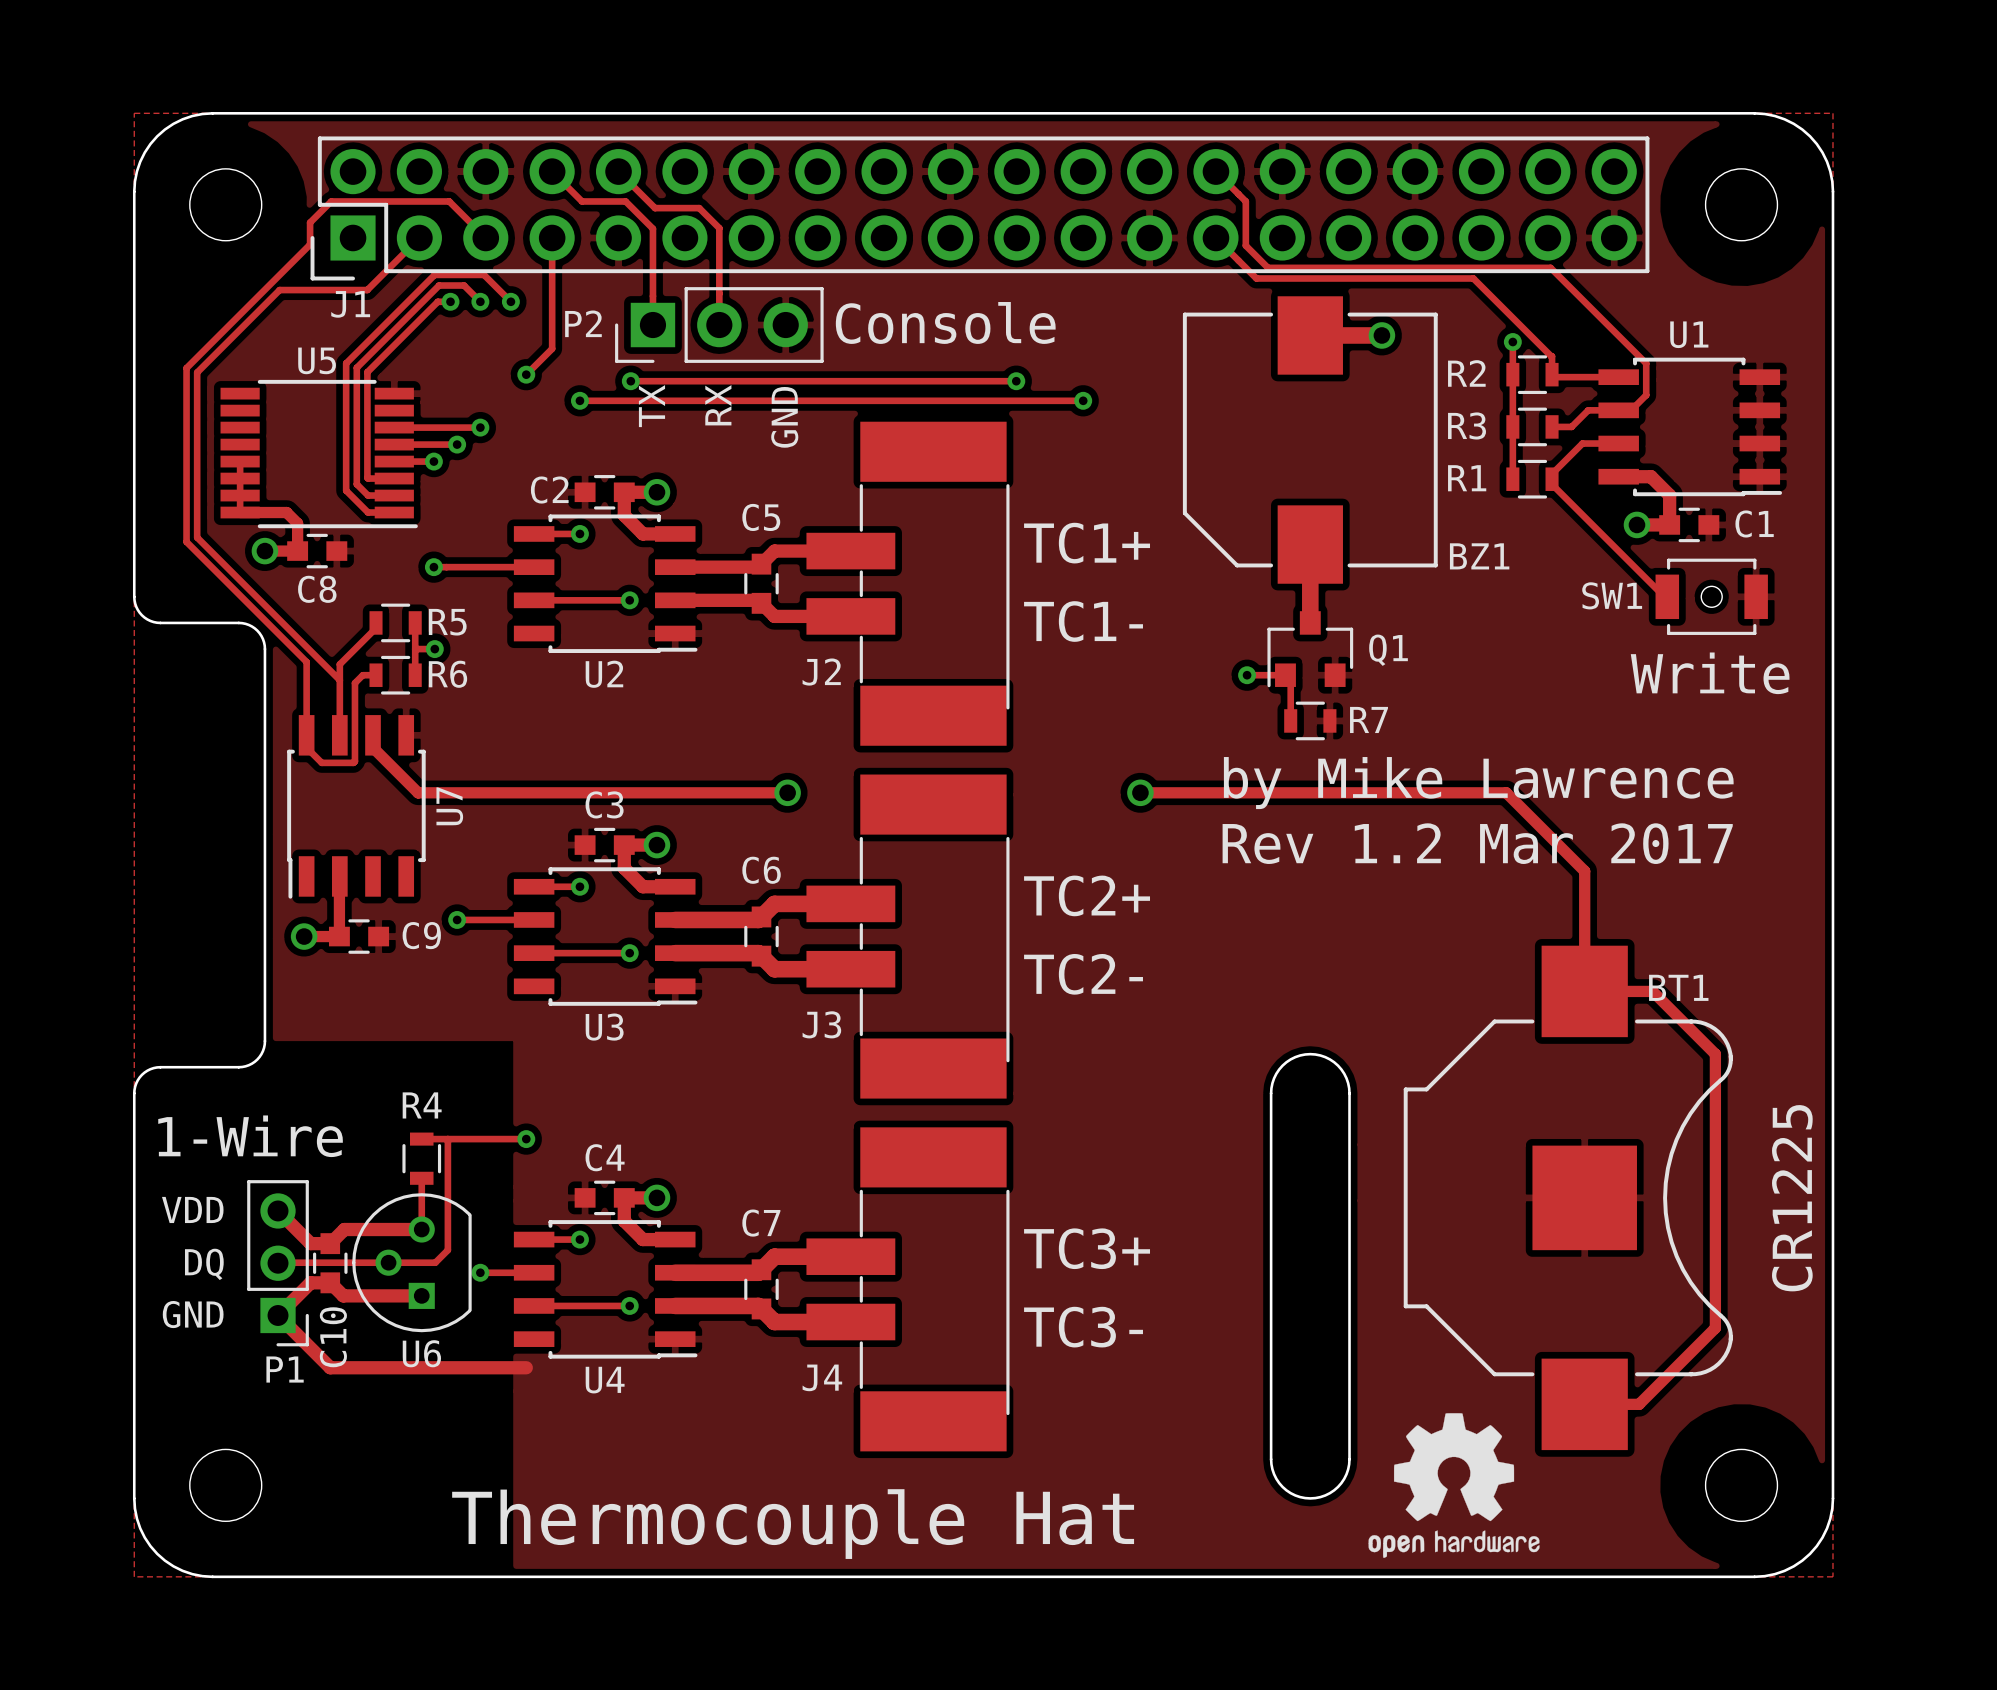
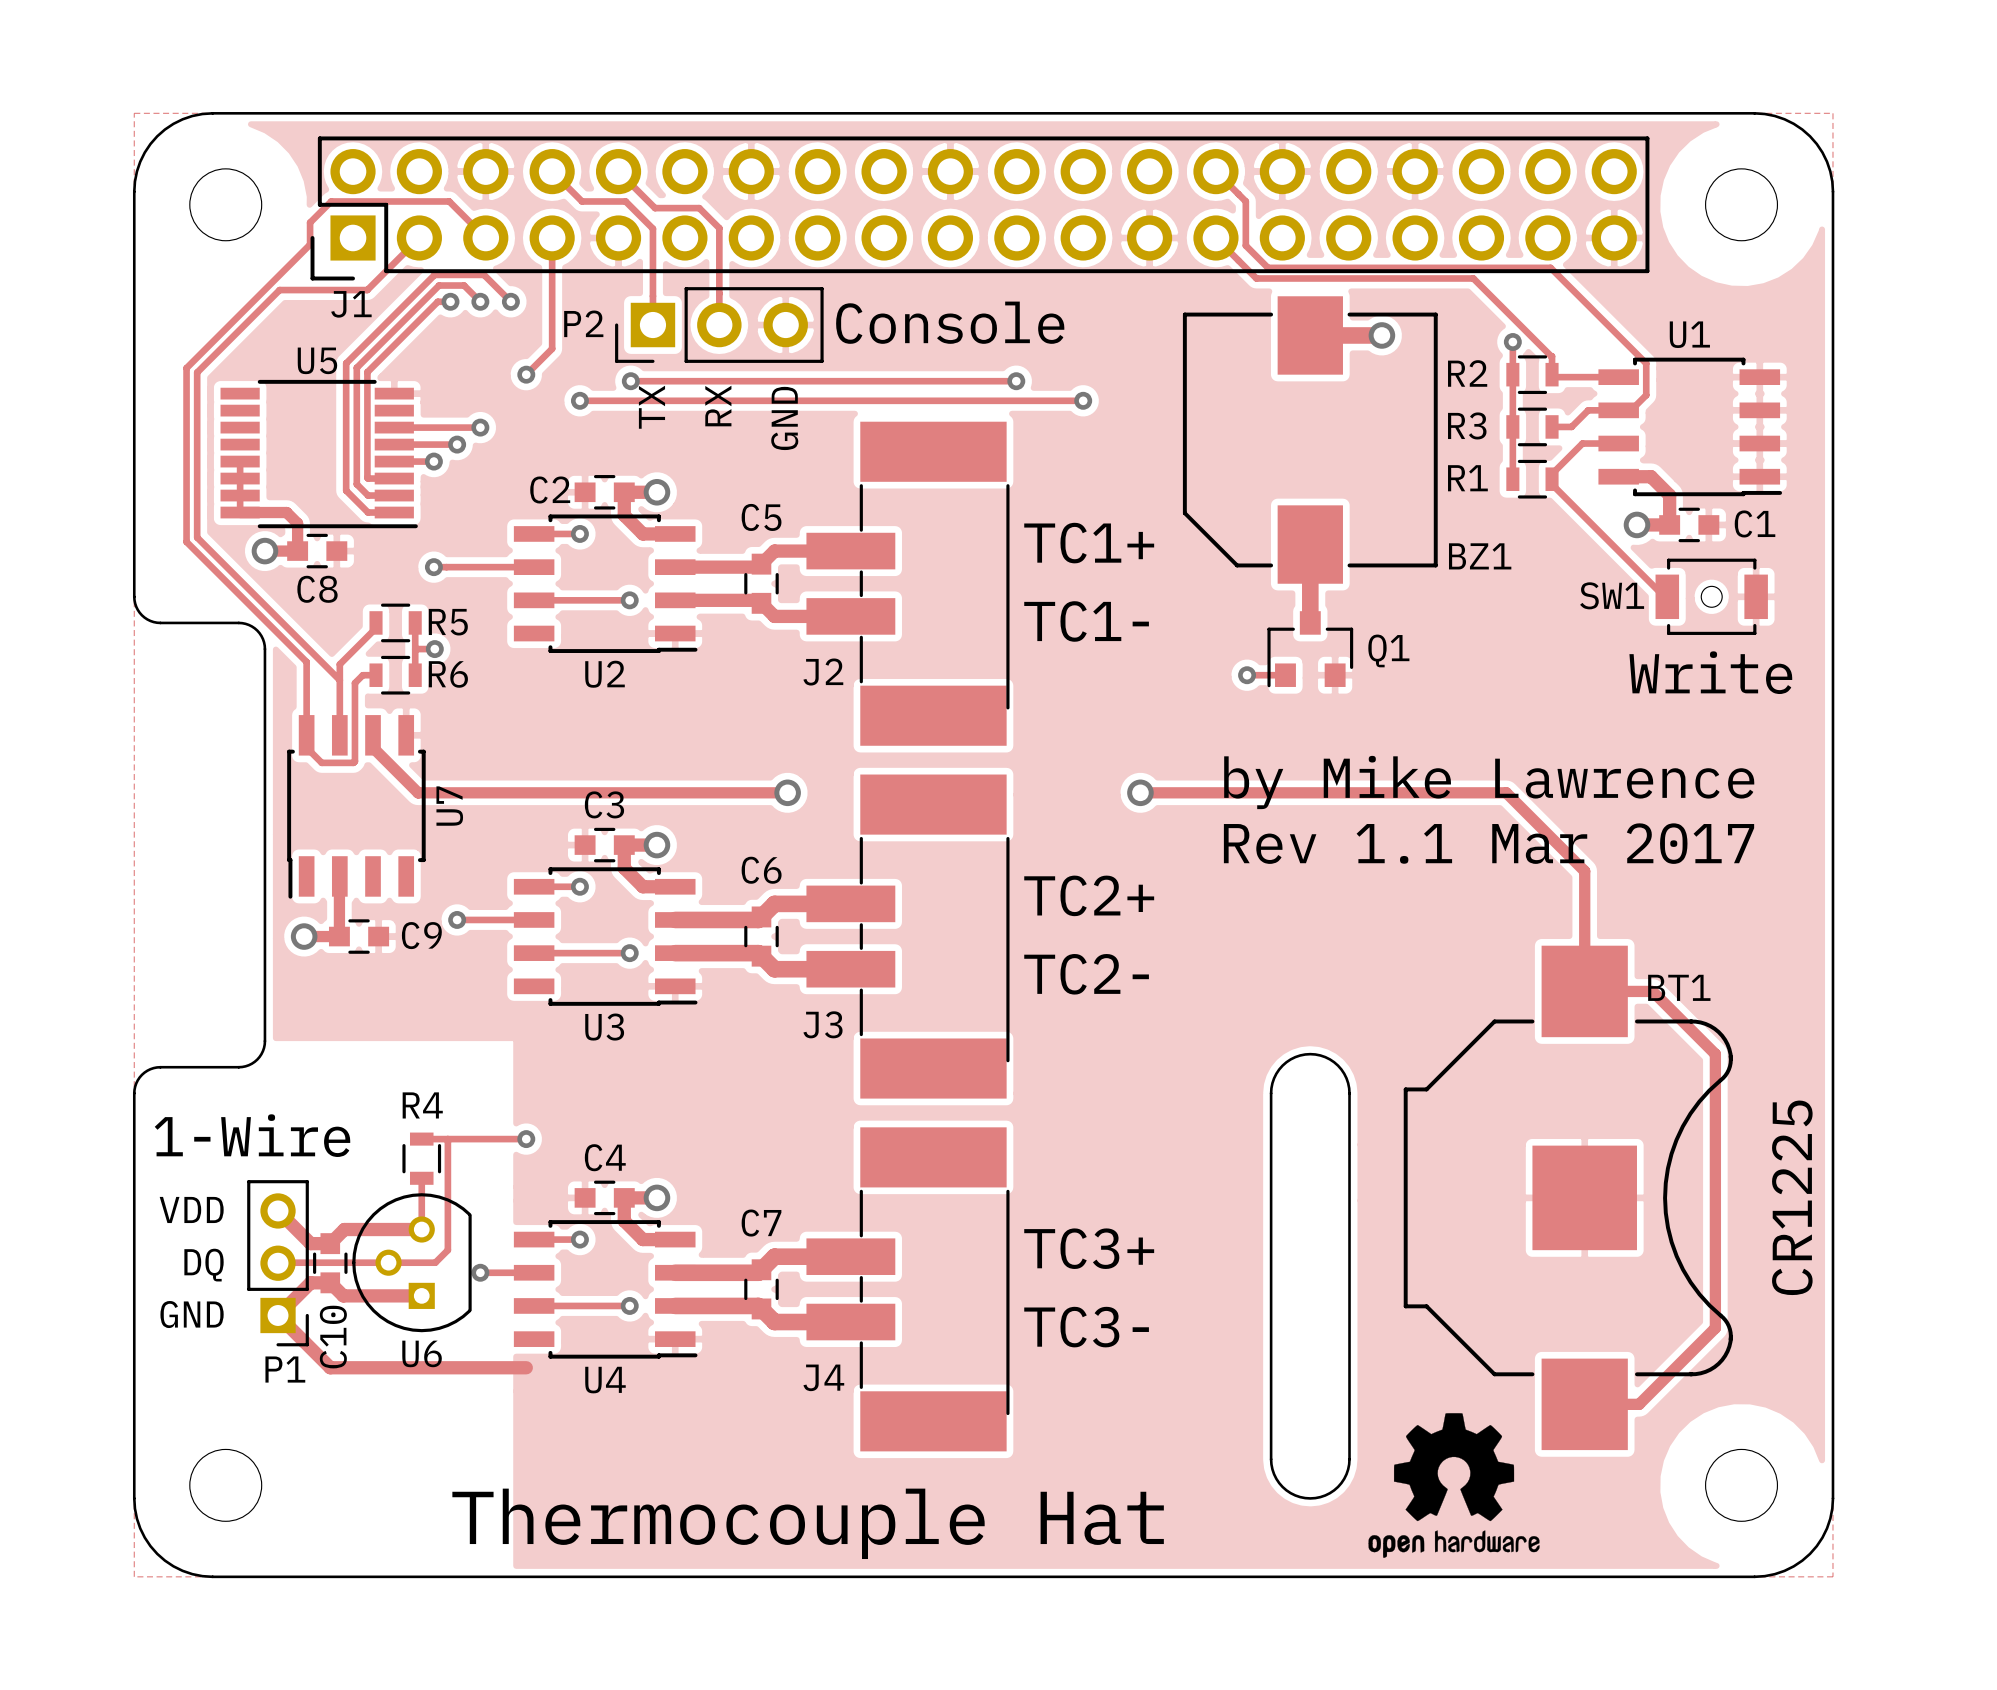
track: (1285, 675) (1290, 680) (1290, 720) -> none
R7: (1310, 720) -> none
text: Rev 1.2 Mar 2017 (1477, 843) -> Rev 1.1 Mar 2017 (1489, 843)

